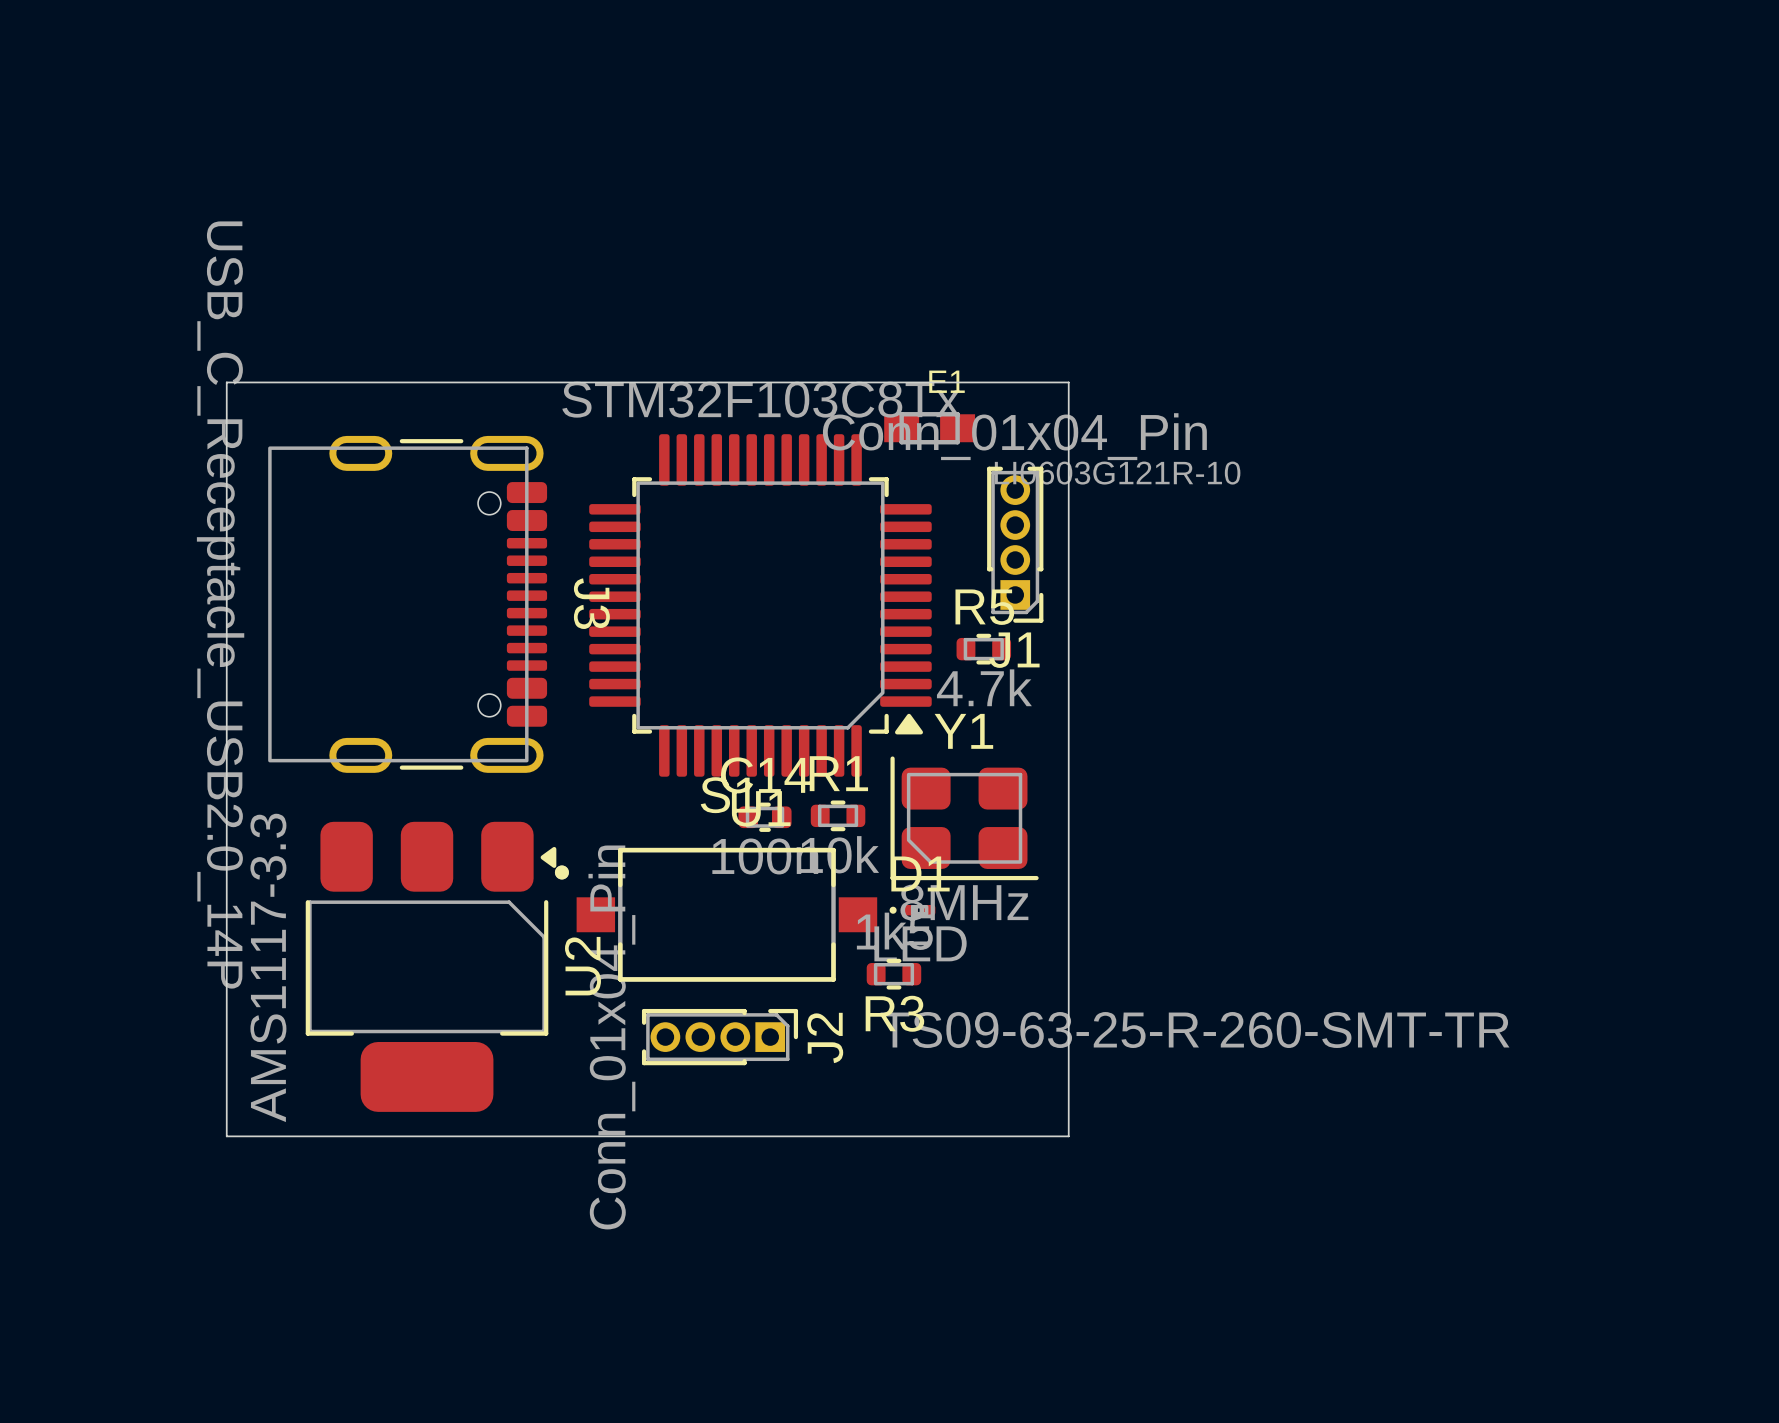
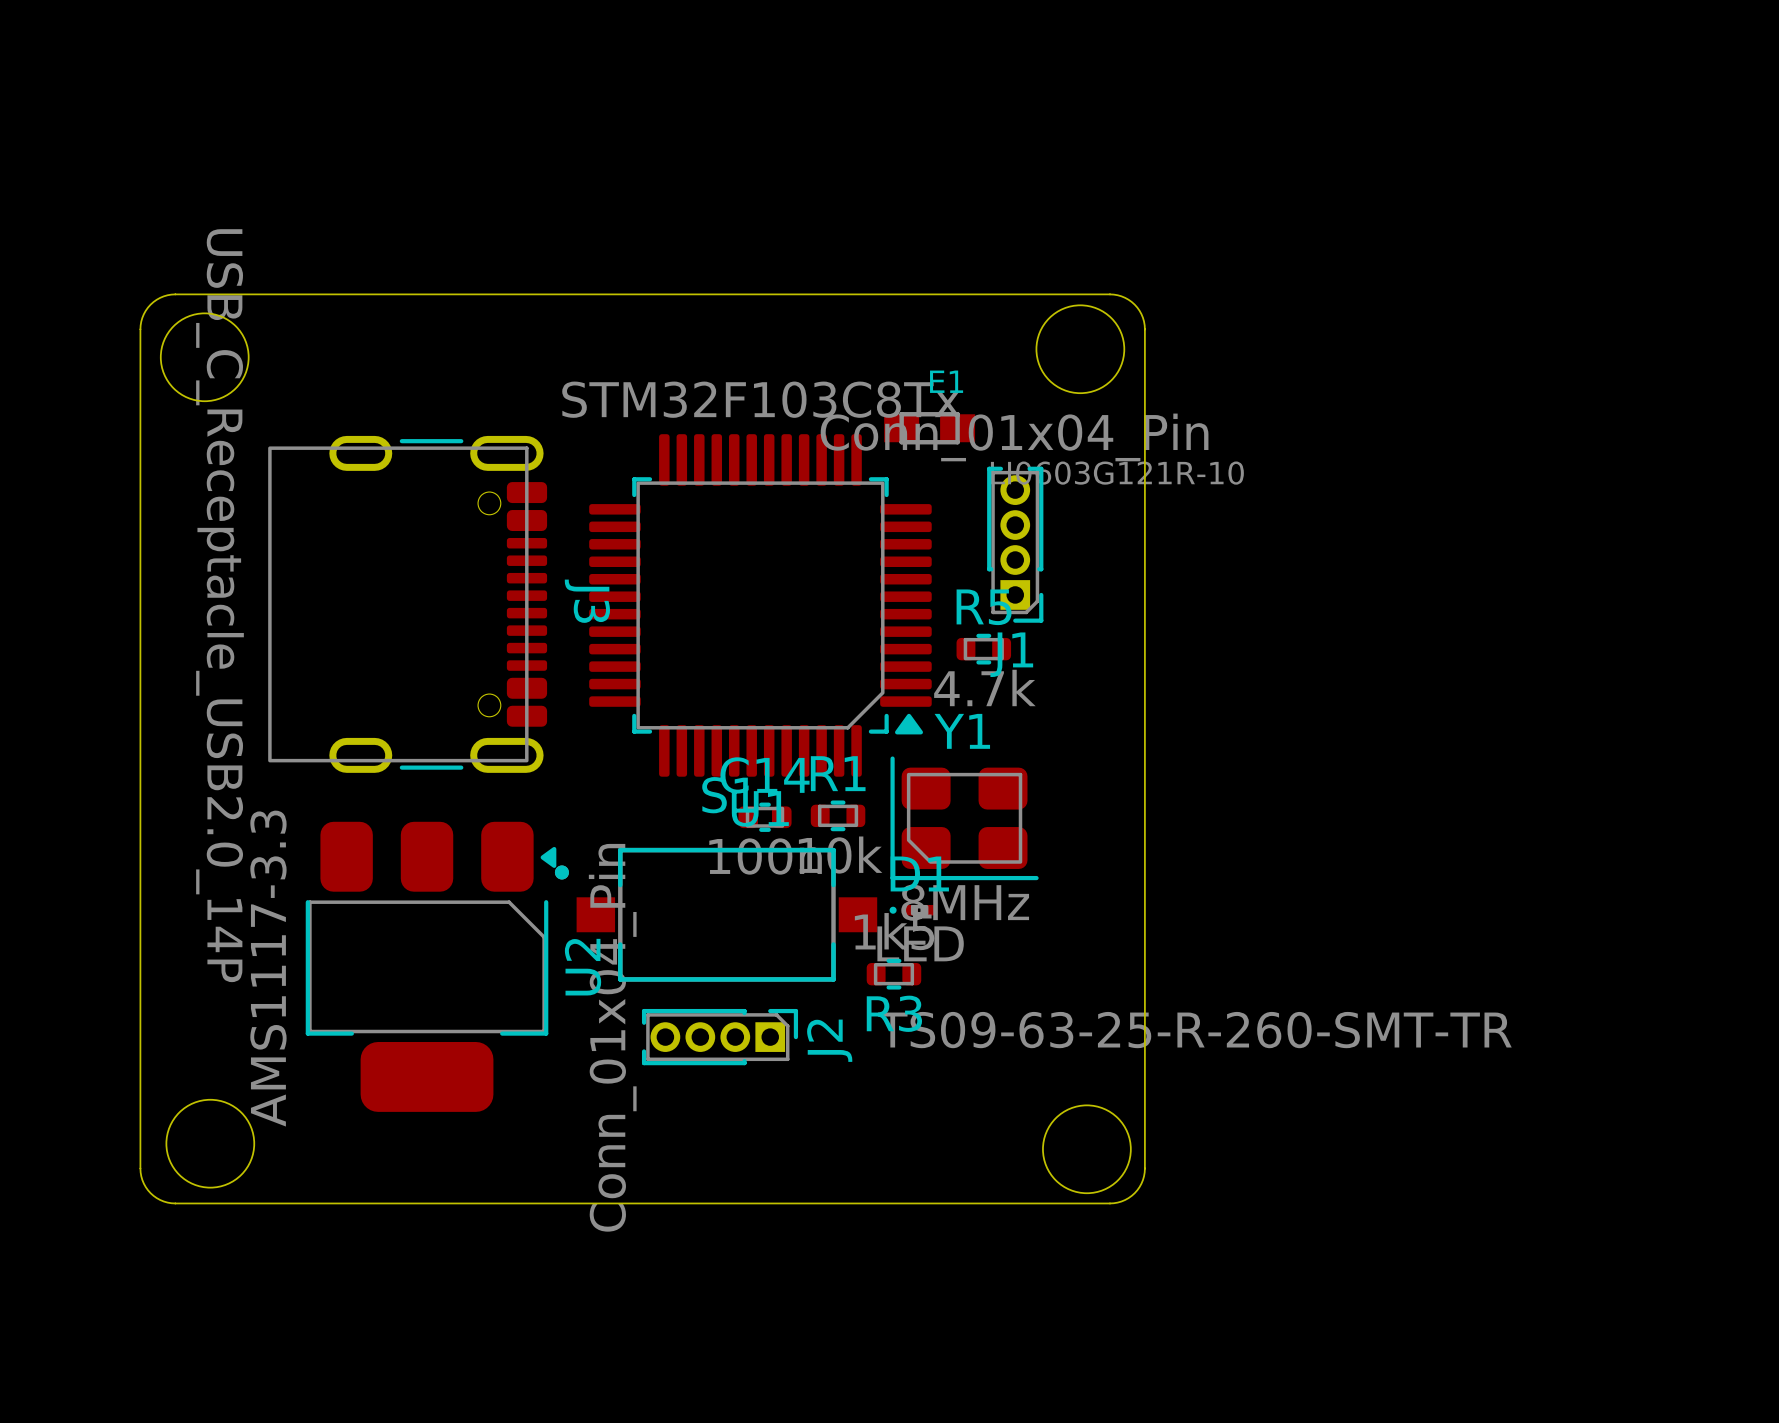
round board edge: none -> [1035, 304, 1126, 395]
round board edge: none -> [159, 312, 250, 403]
board edge: (226, 382) (1068, 382) (1068, 1136) (226, 1136) (226, 382) -> (175, 294) (160, 297) (150, 304) (143, 314) (140, 329) (140, 1168) (142, 1180) (150, 1193) (163, 1201) (175, 1203) (1109, 1203) (1121, 1201) (1134, 1193) (1141, 1183) (1144, 1168) (1144, 329) (1142, 317) (1134, 304) (1121, 296) (1109, 294) (175, 294)
round board edge: none -> [165, 1098, 256, 1189]
round board edge: none -> [1042, 1104, 1132, 1195]

